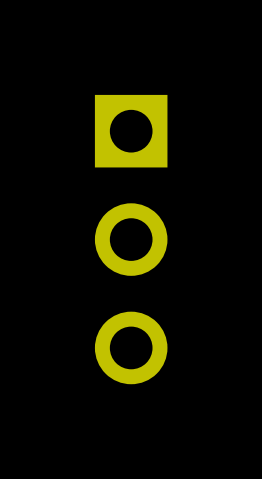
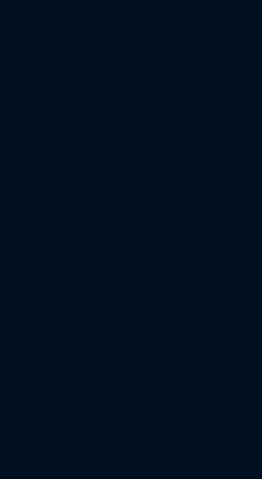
part: (131, 239) -> none

